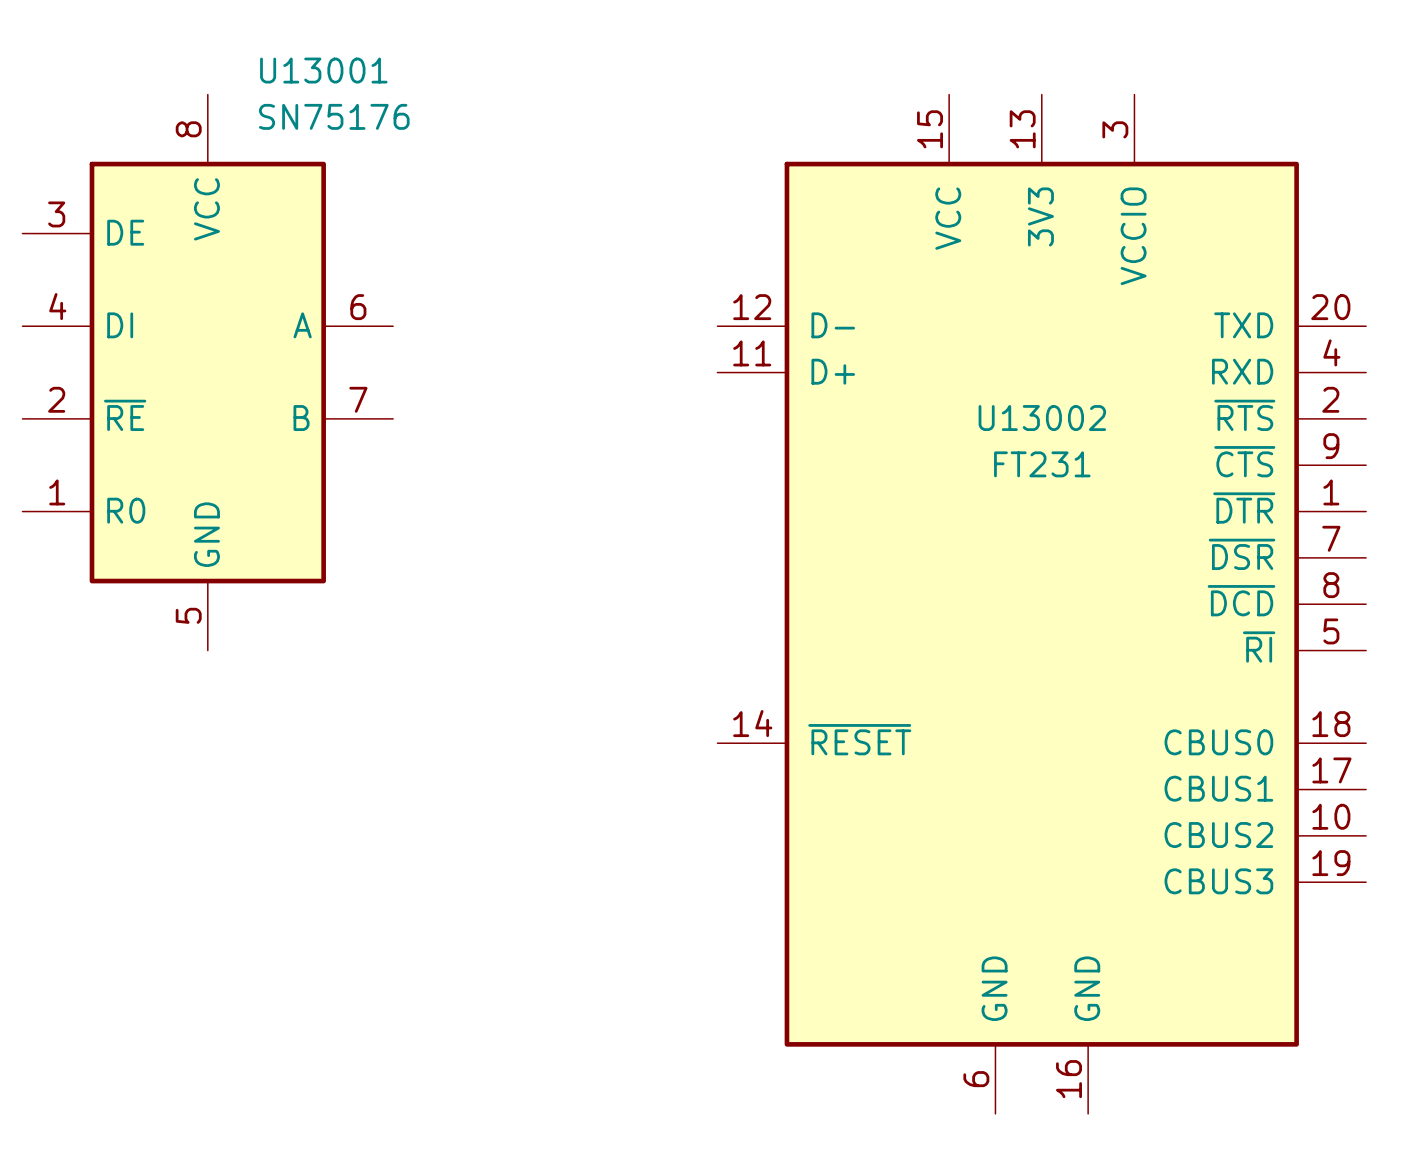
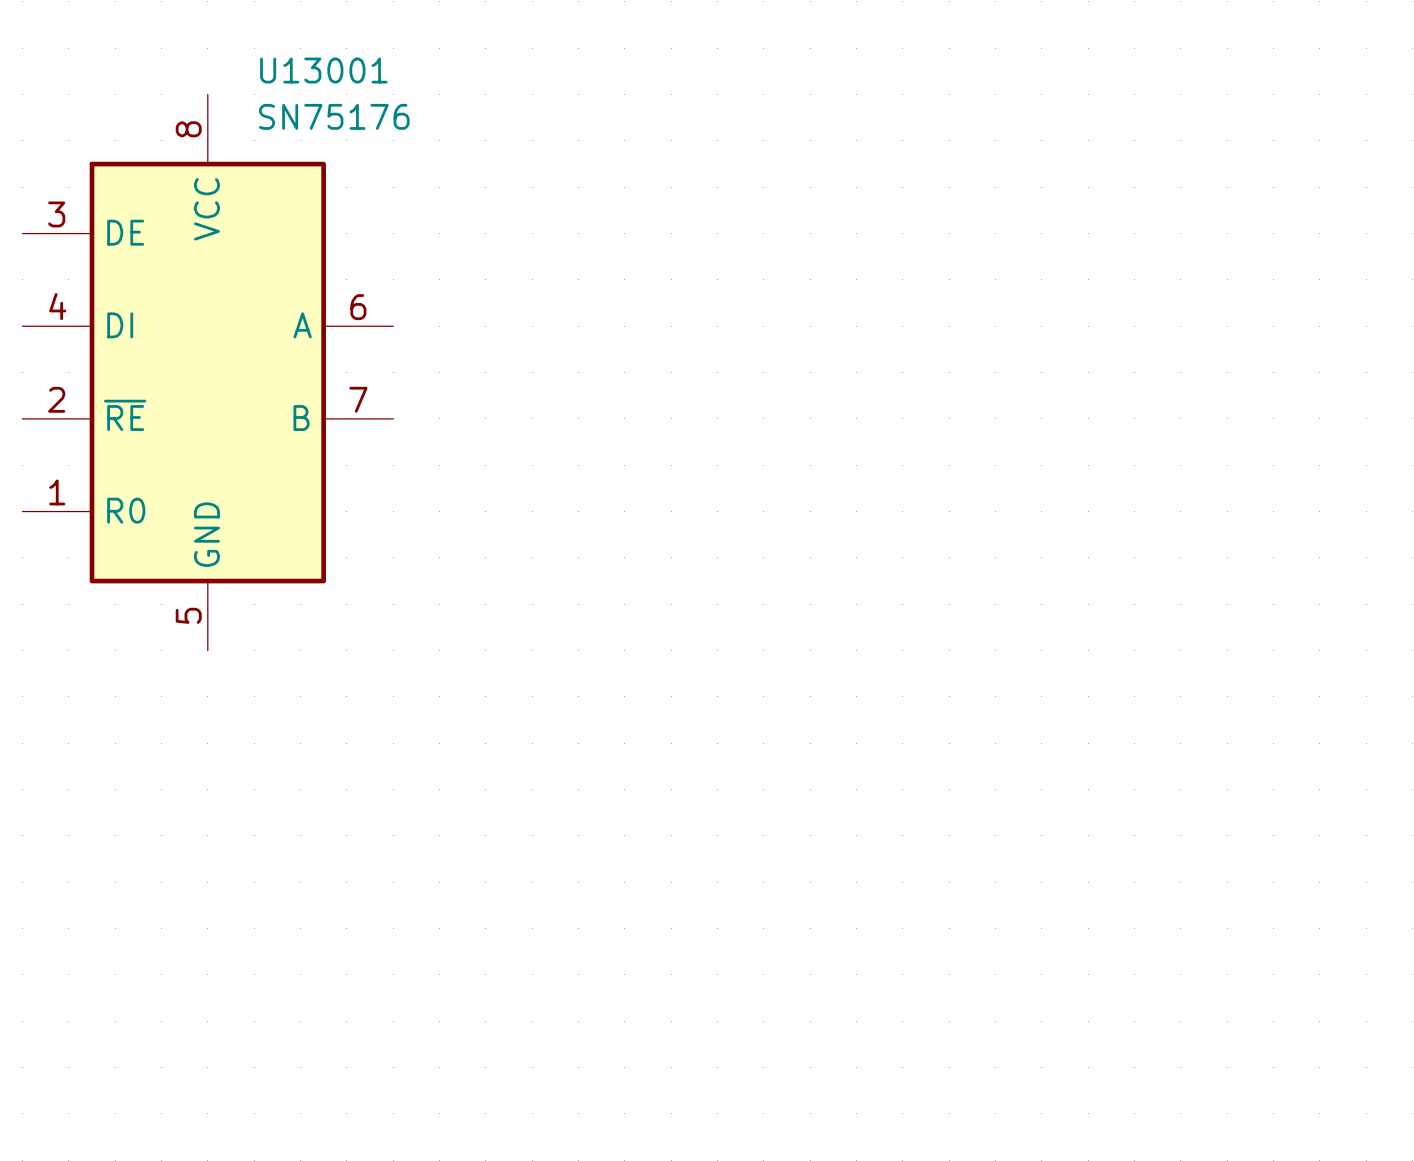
U13002: FT231 (1041, 604) -> none

